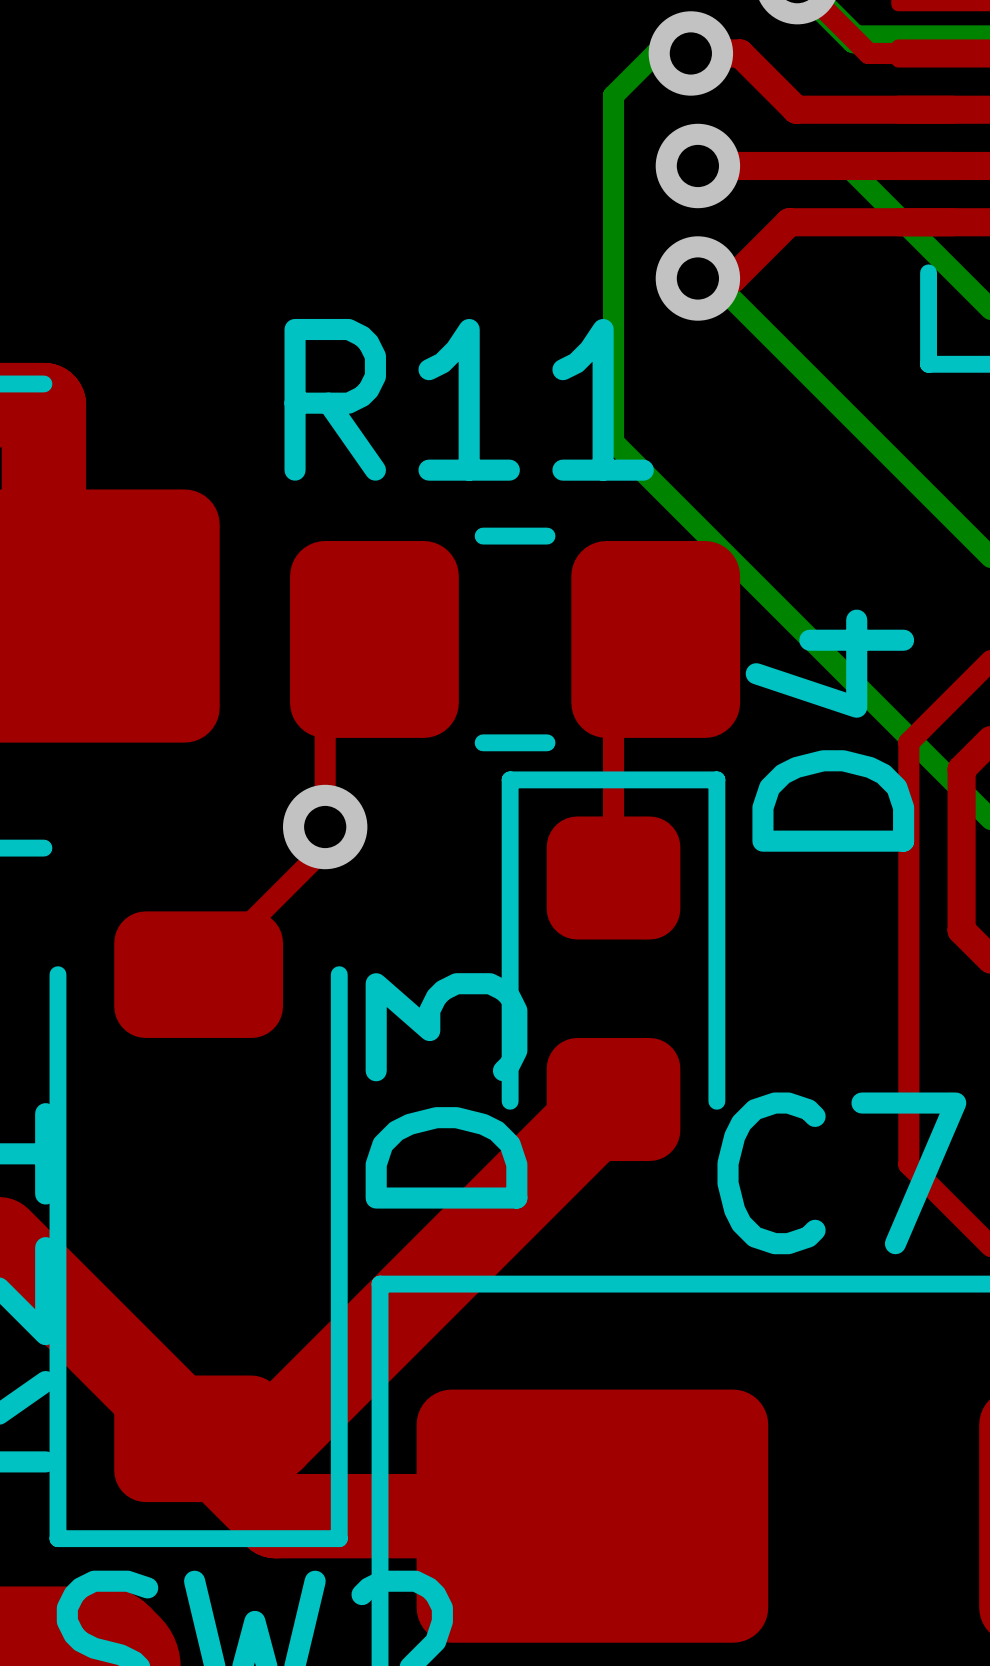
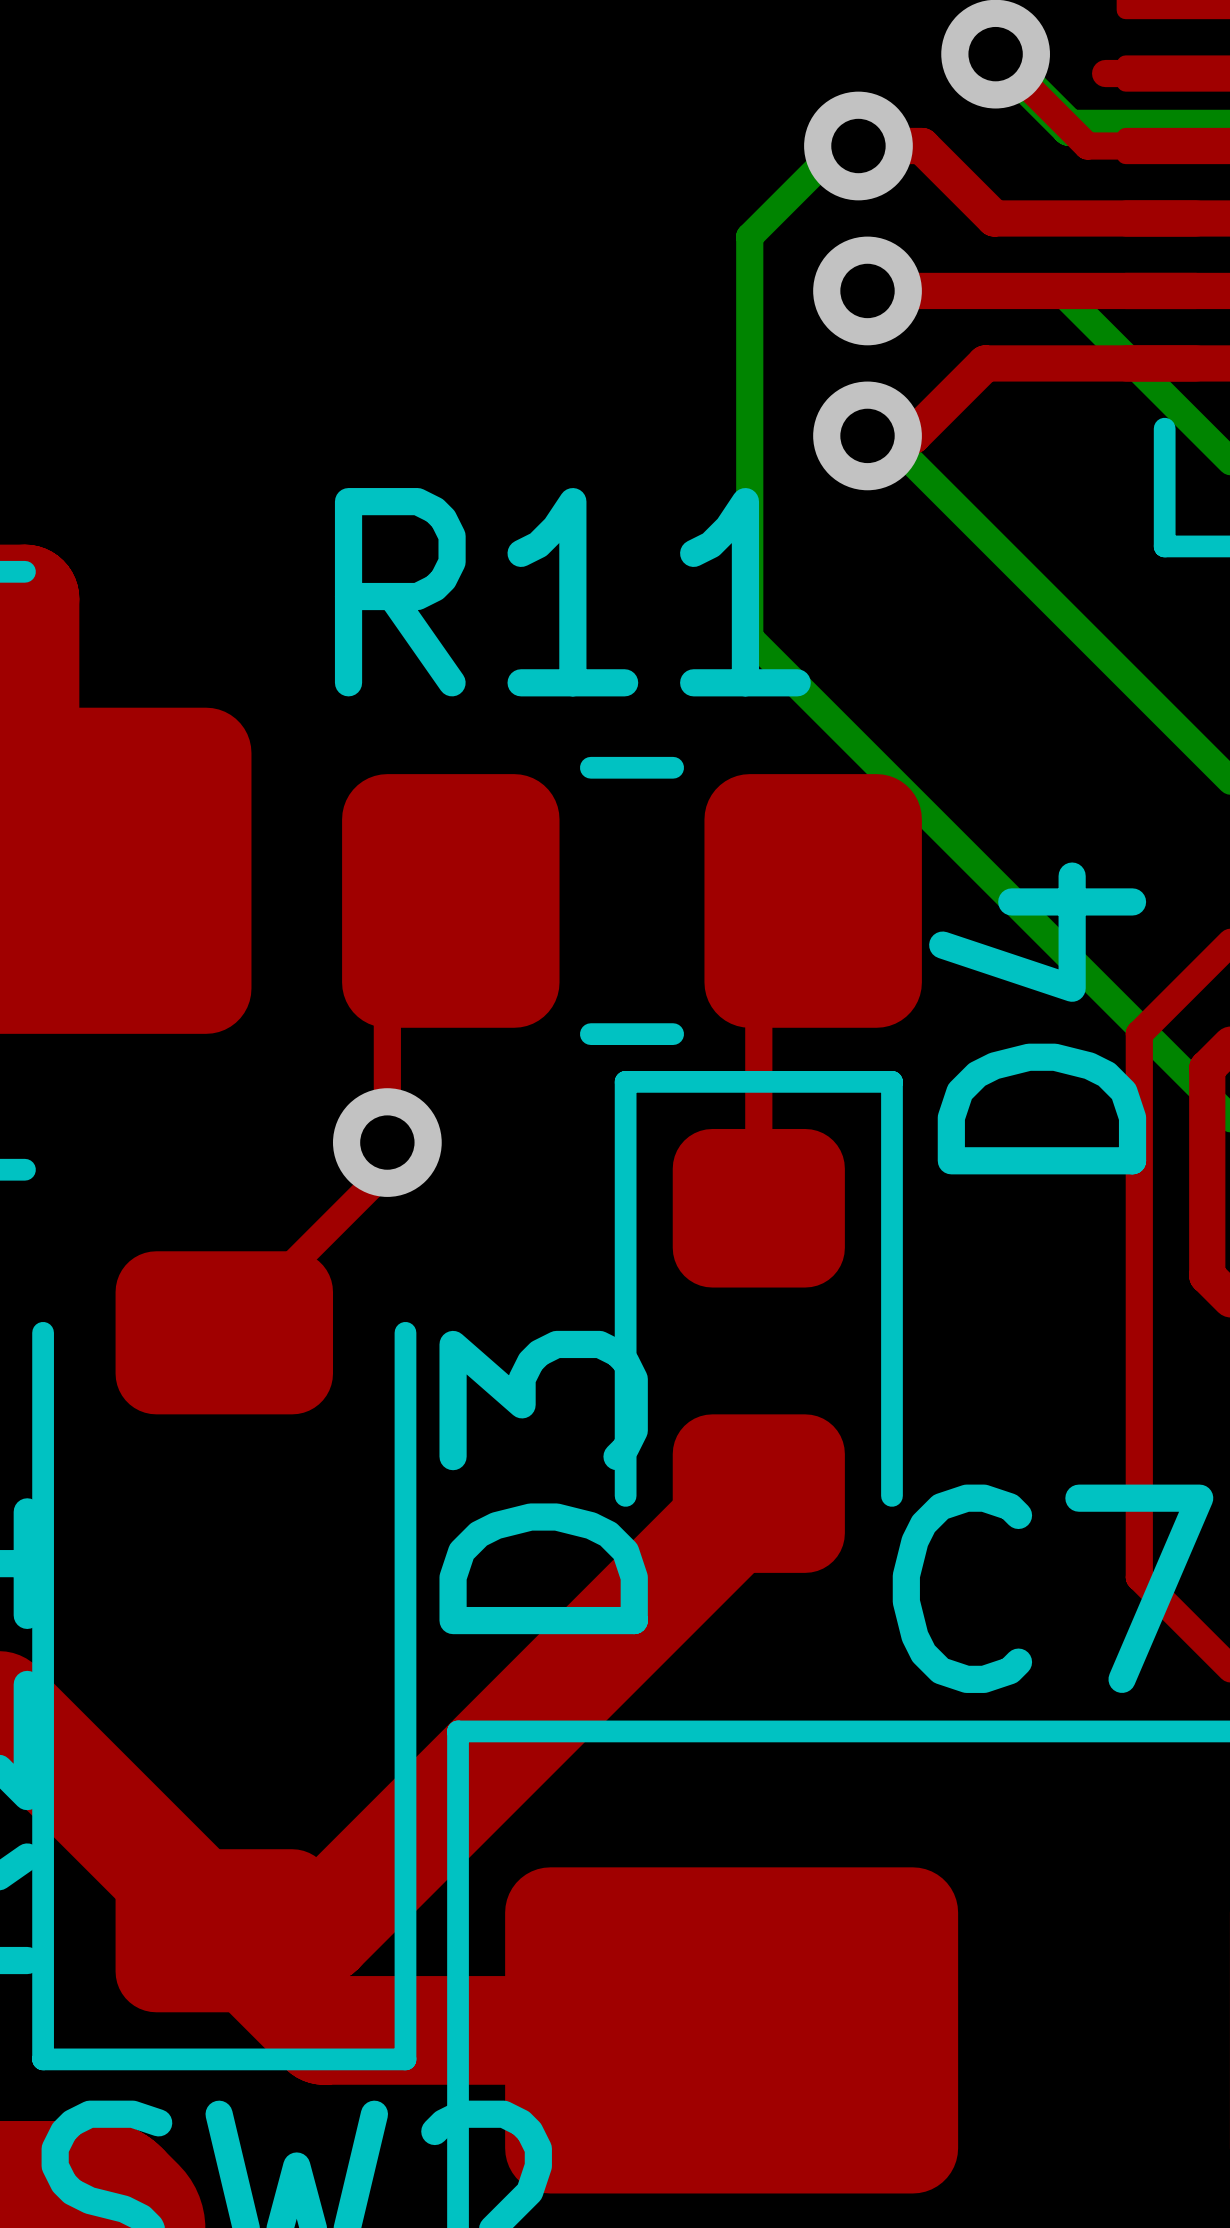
bottom track: (676, 53) (655, 53) (613, 95) (613, 442) -> (840, 146) (749, 236) (749, 637) (758, 646)

